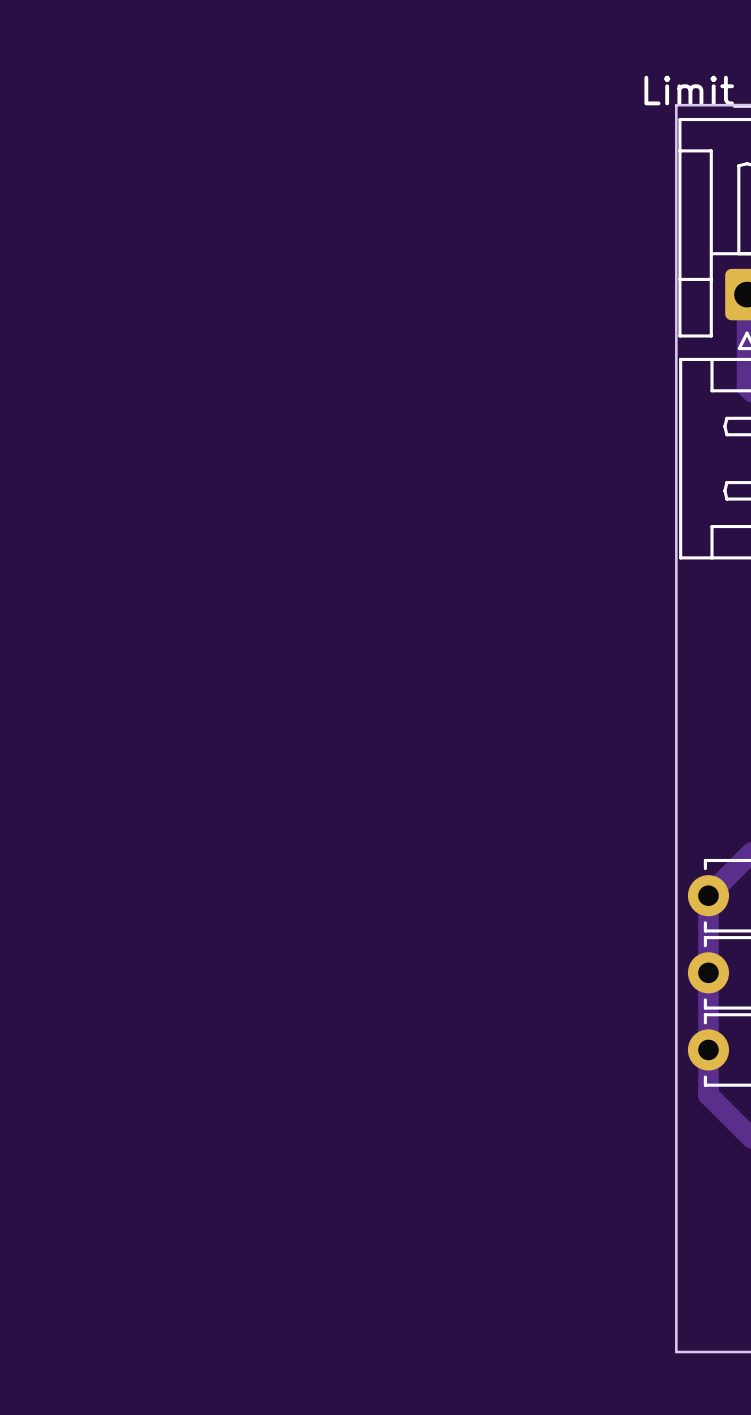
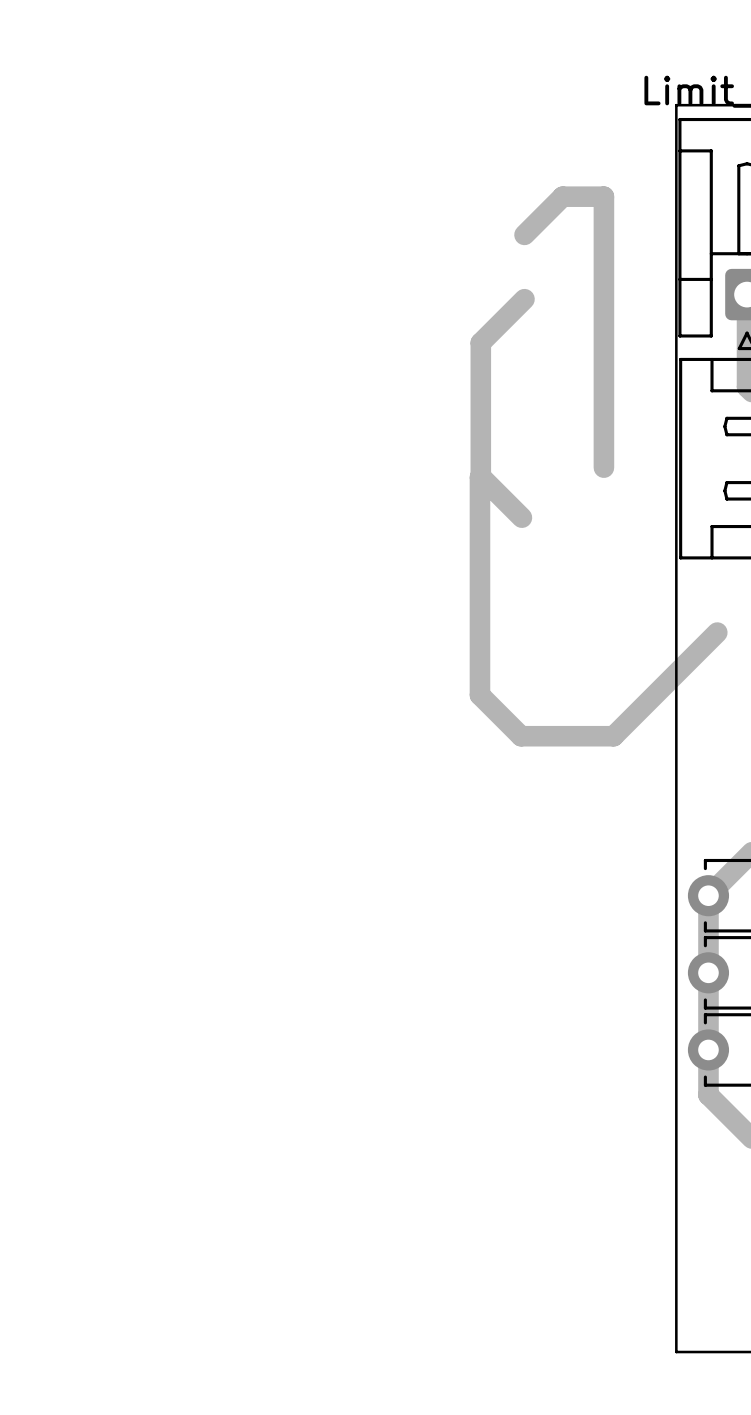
track: none -> (524, 234) (562, 196) (603, 196) (603, 467)
track: none -> (524, 299) (480, 342) (480, 476)
track: none -> (480, 476) (479, 695) (521, 736) (613, 736) (717, 632)
track: none -> (480, 476) (521, 517)

